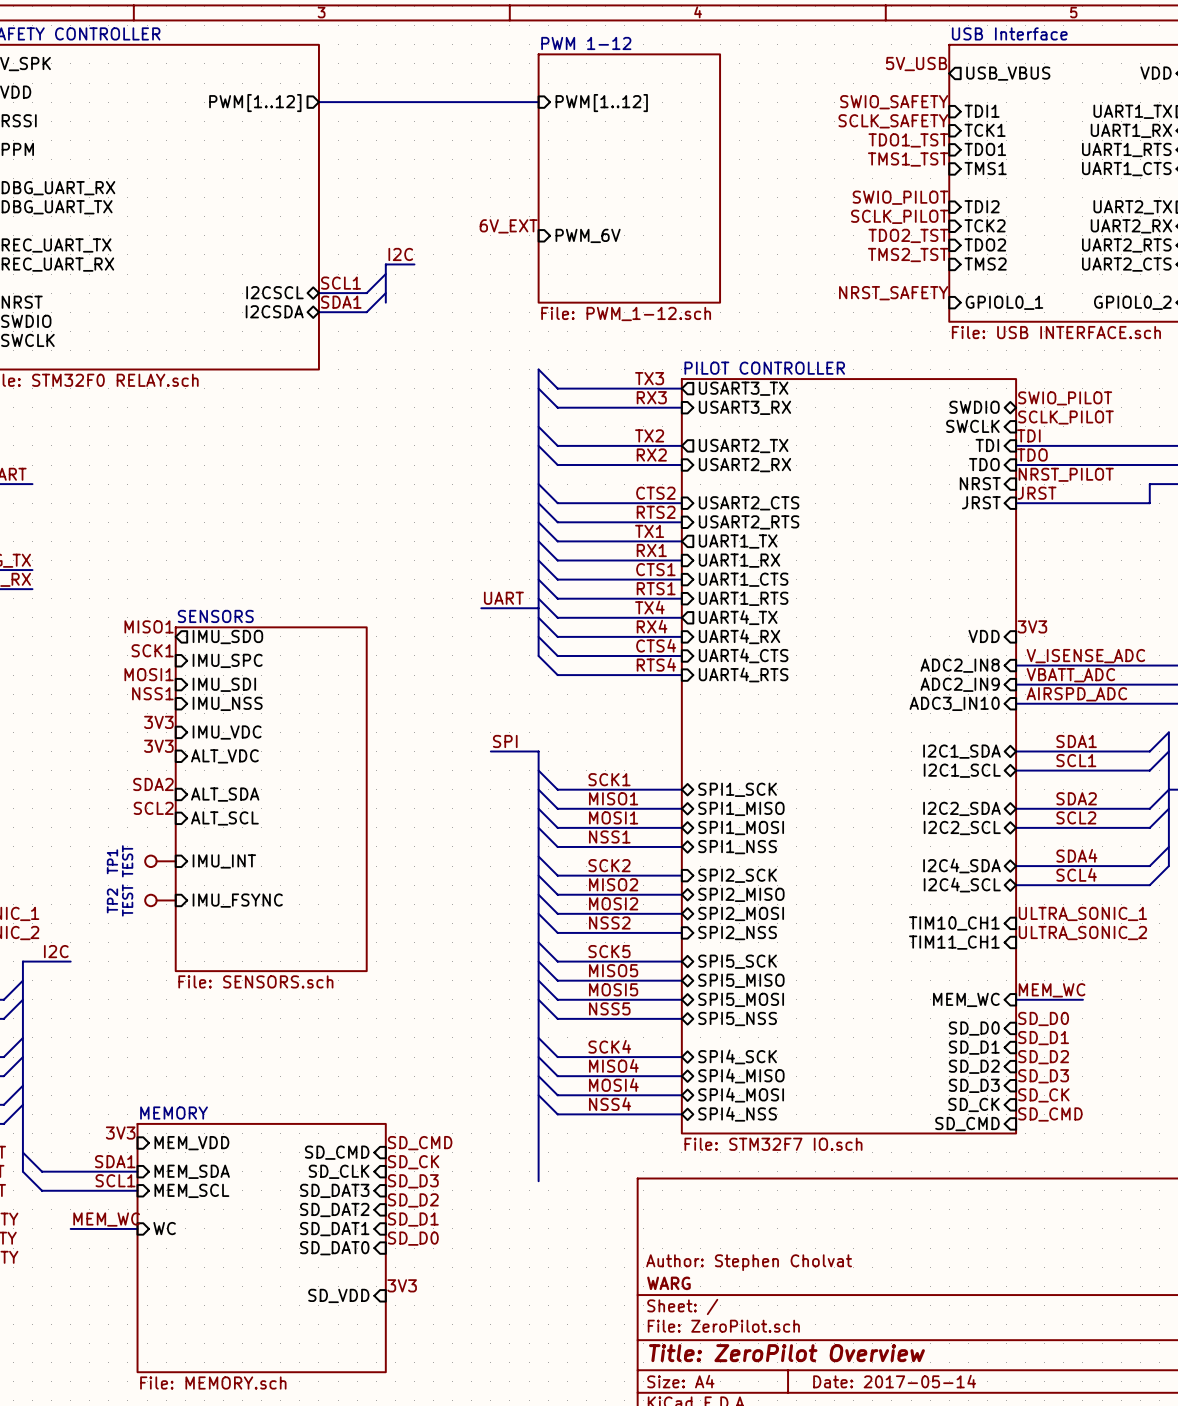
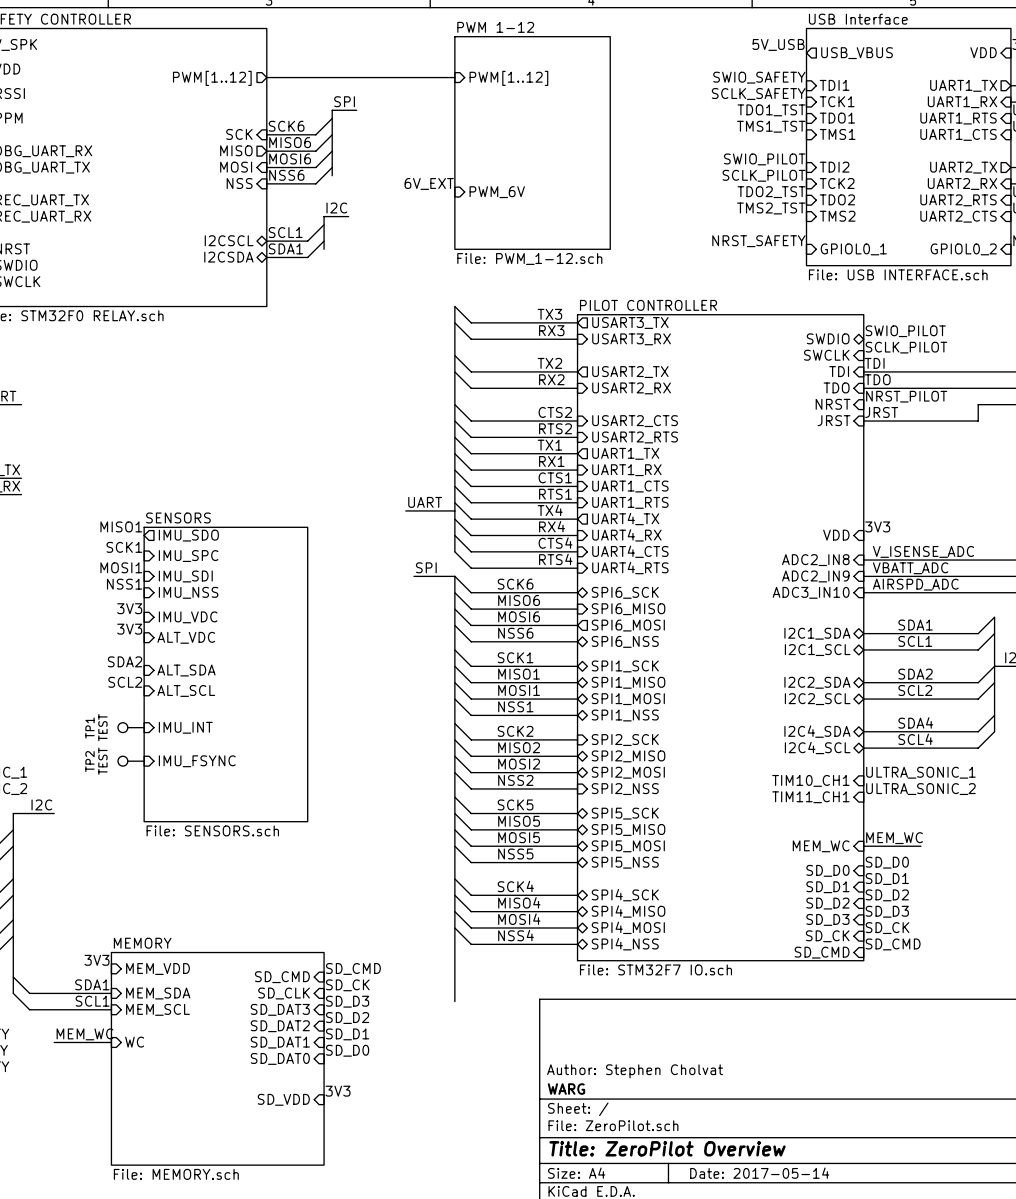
label: none -> SPI (344, 101)
bus: none -> (356, 110) (332, 110) (332, 175)
wire: none -> (332, 118) (315, 134) (266, 134)
label: none -> SCK6 (286, 126)
sheet pin: none -> SCK (239, 134)
wire: none -> (332, 134) (315, 151) (266, 151)
label: none -> MISO6 (290, 142)
sheet pin: none -> MISO (236, 150)
wire: none -> (332, 151) (315, 167) (266, 167)
label: none -> MOSI6 (290, 158)
sheet pin: none -> MOSI (236, 167)
wire: none -> (332, 167) (315, 183) (266, 183)
label: none -> NSS6 (286, 175)
sheet pin: none -> NSS (239, 183)
wire: none -> (454, 576) (471, 592) (577, 592)
label: none -> SCK6 (515, 584)
wire: none -> (454, 592) (471, 609) (577, 609)
sheet pin: none -> SPI6_SCK (625, 592)
label: none -> MISO6 (519, 600)
wire: none -> (454, 609) (471, 625) (577, 625)
sheet pin: none -> SPI6_MISO (628, 609)
label: none -> MOSI6 (519, 616)
label position: SPI (505, 741) -> SPI (426, 567)
wire: none -> (454, 625) (471, 641) (577, 641)
sheet pin: none -> SPI6_MOSI (628, 625)
bus: (490, 751) (538, 751) -> (413, 576) (454, 576) (454, 633)
label: none -> NSS6 (515, 633)
sheet pin: none -> SPI6_NSS (625, 641)

